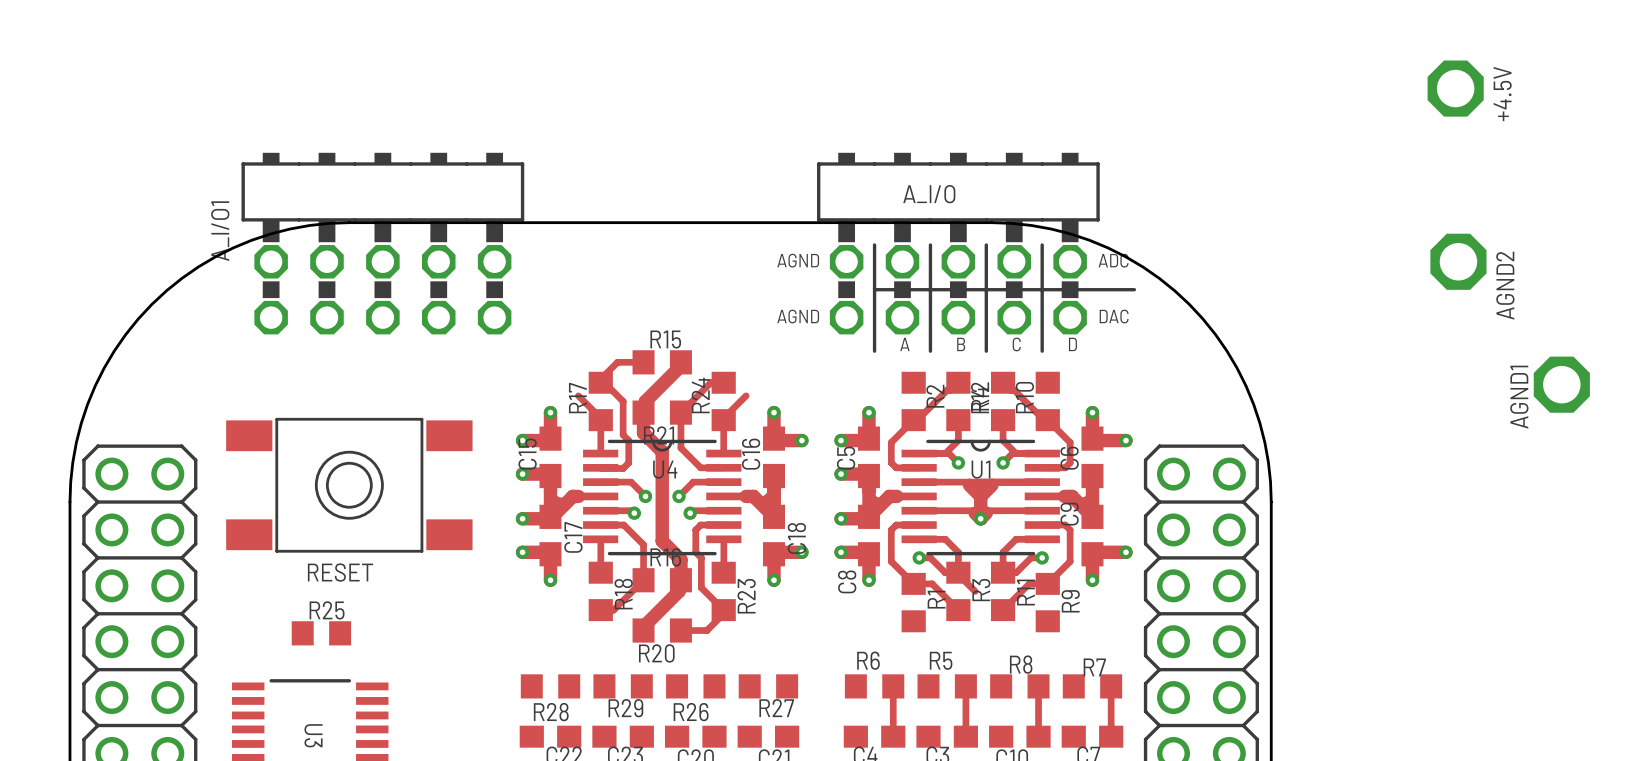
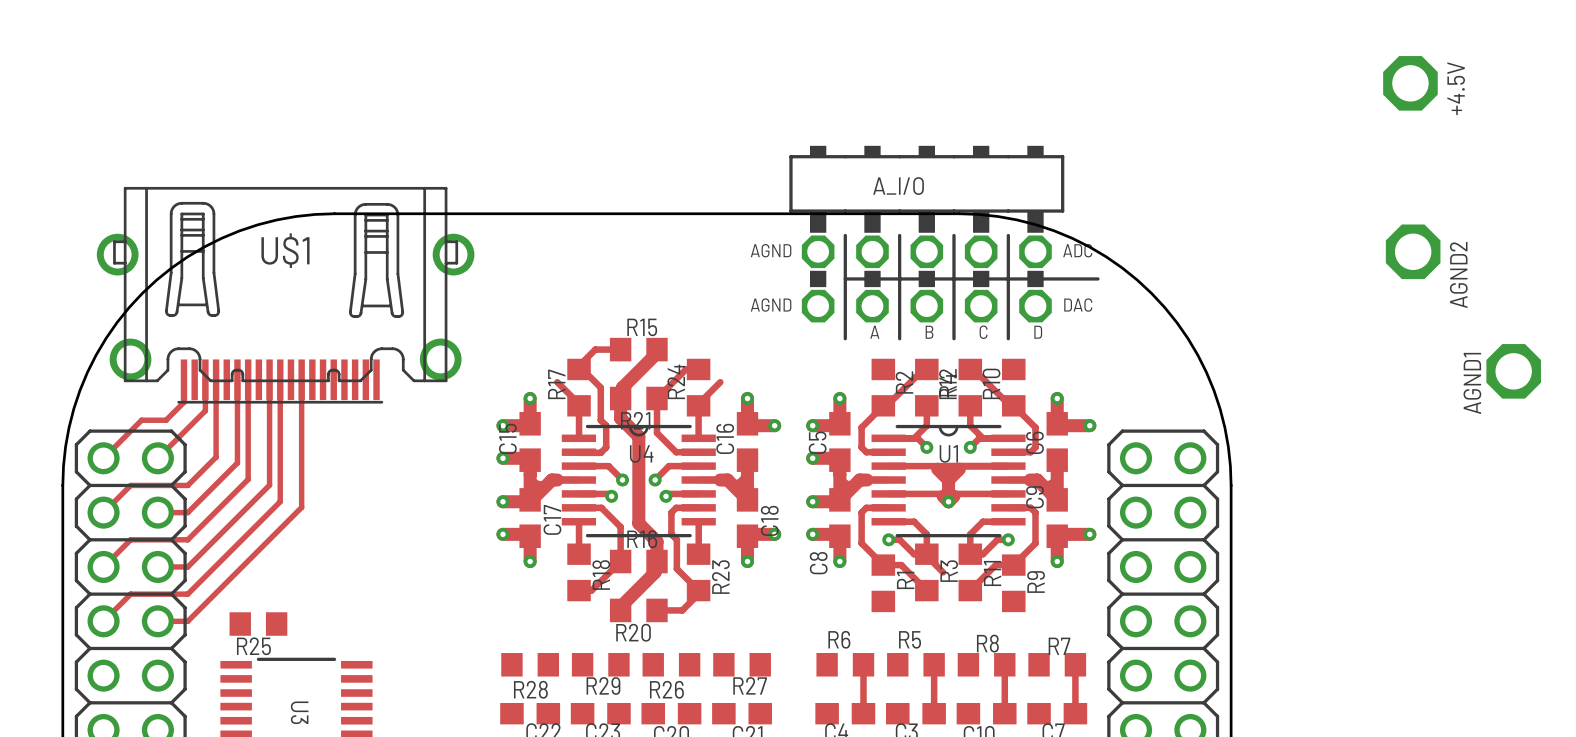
A_I/O1: (382, 243) -> none
U$1: none -> (285, 295)
track: none -> (183, 379) (183, 402) (166, 420) (141, 420) (103, 458)
track: none -> (205, 379) (205, 410) (157, 458)
track: none -> (216, 379) (216, 457) (187, 485) (130, 485) (103, 512)
track: none -> (237, 379) (237, 462) (187, 512) (157, 512)
track: none -> (248, 379) (248, 479) (187, 539) (130, 539) (103, 566)
track: none -> (269, 379) (269, 485) (187, 566) (157, 566)
track: none -> (280, 379) (280, 501) (187, 594) (130, 594) (103, 621)
track: none -> (301, 379) (301, 507) (187, 621) (157, 621)
RESET: (349, 485) -> none
R25 name position: R25 (327, 610) -> R25 (253, 646)
R25 position: (321, 633) -> (258, 624)

